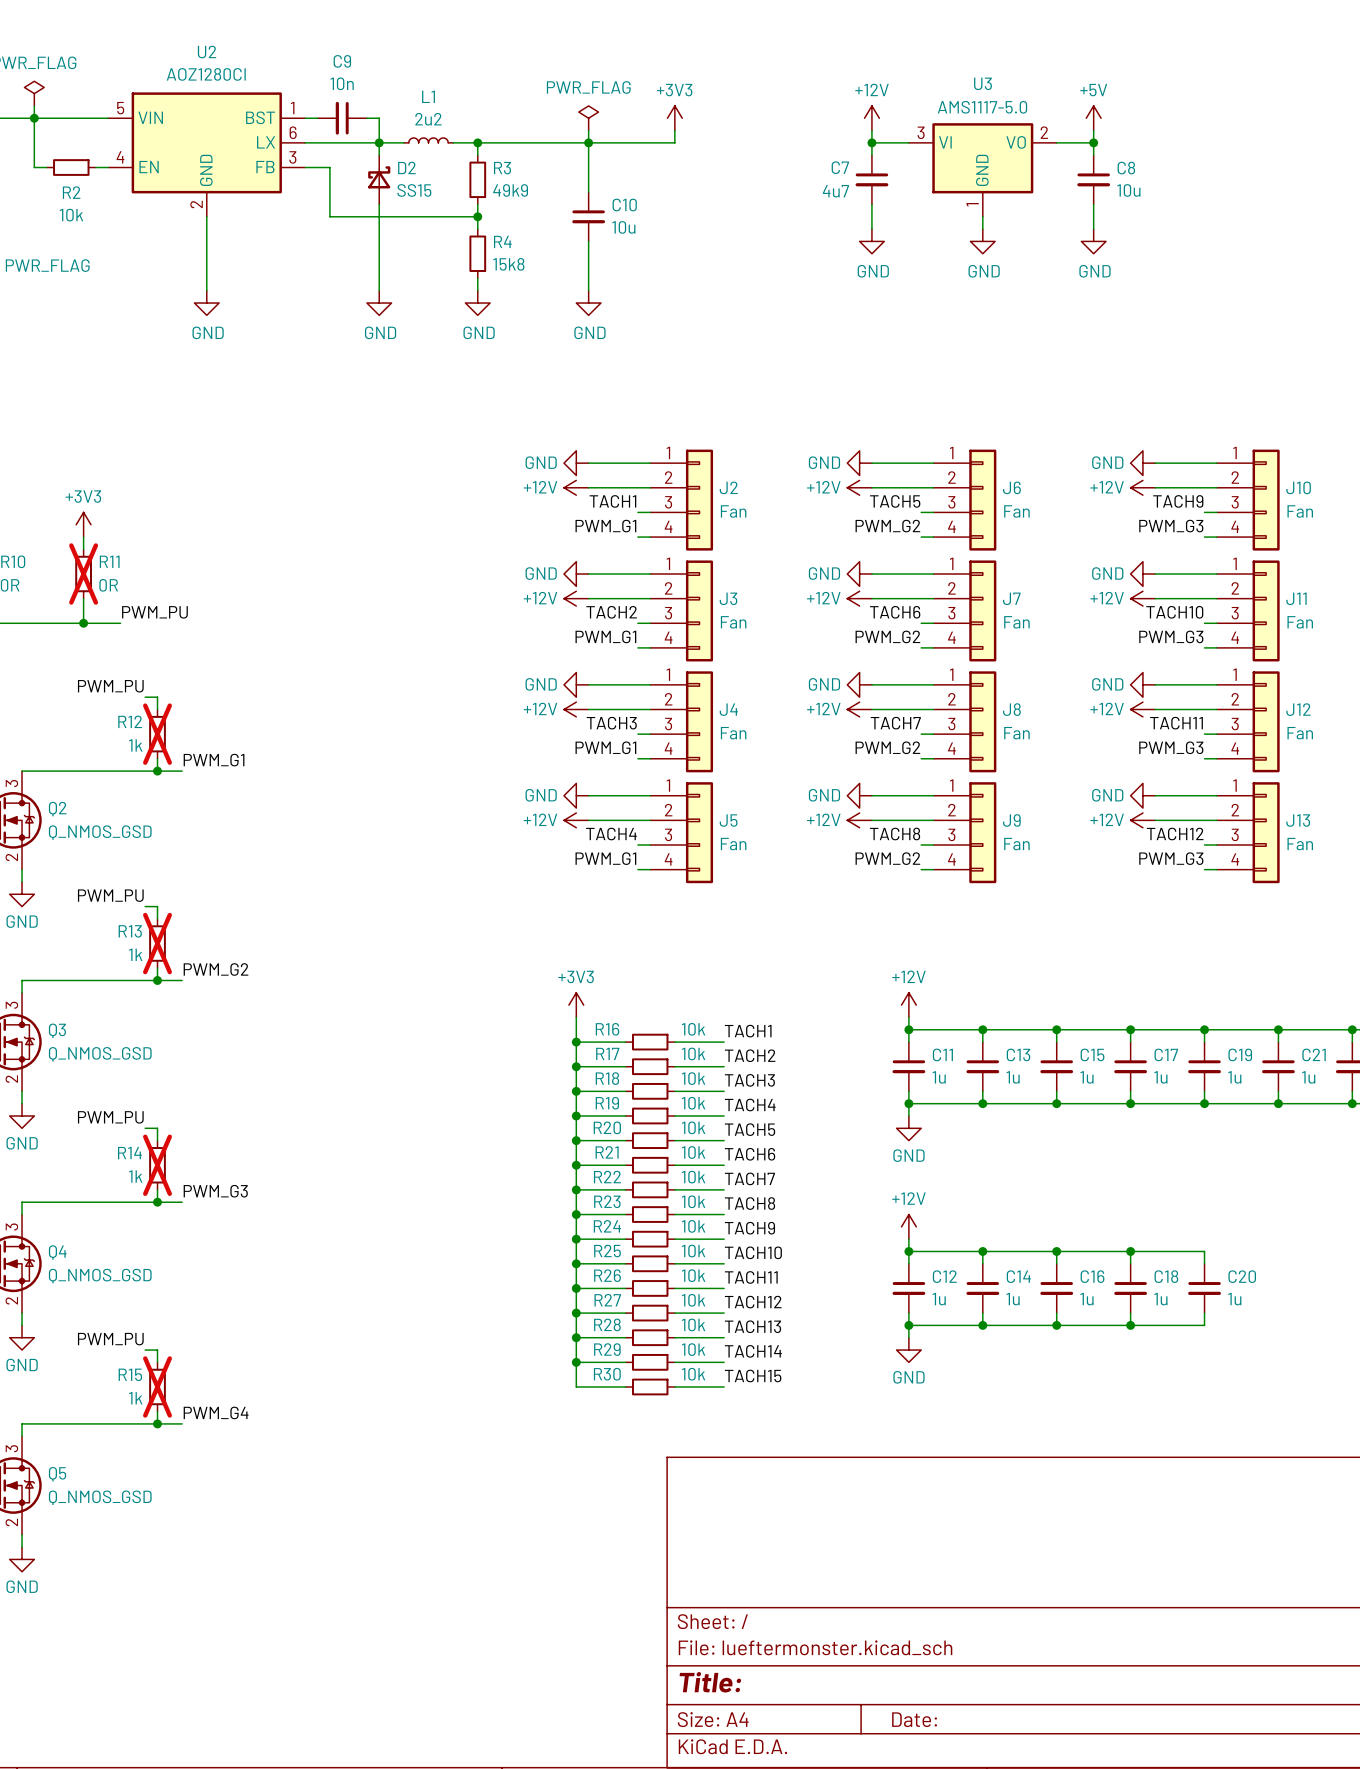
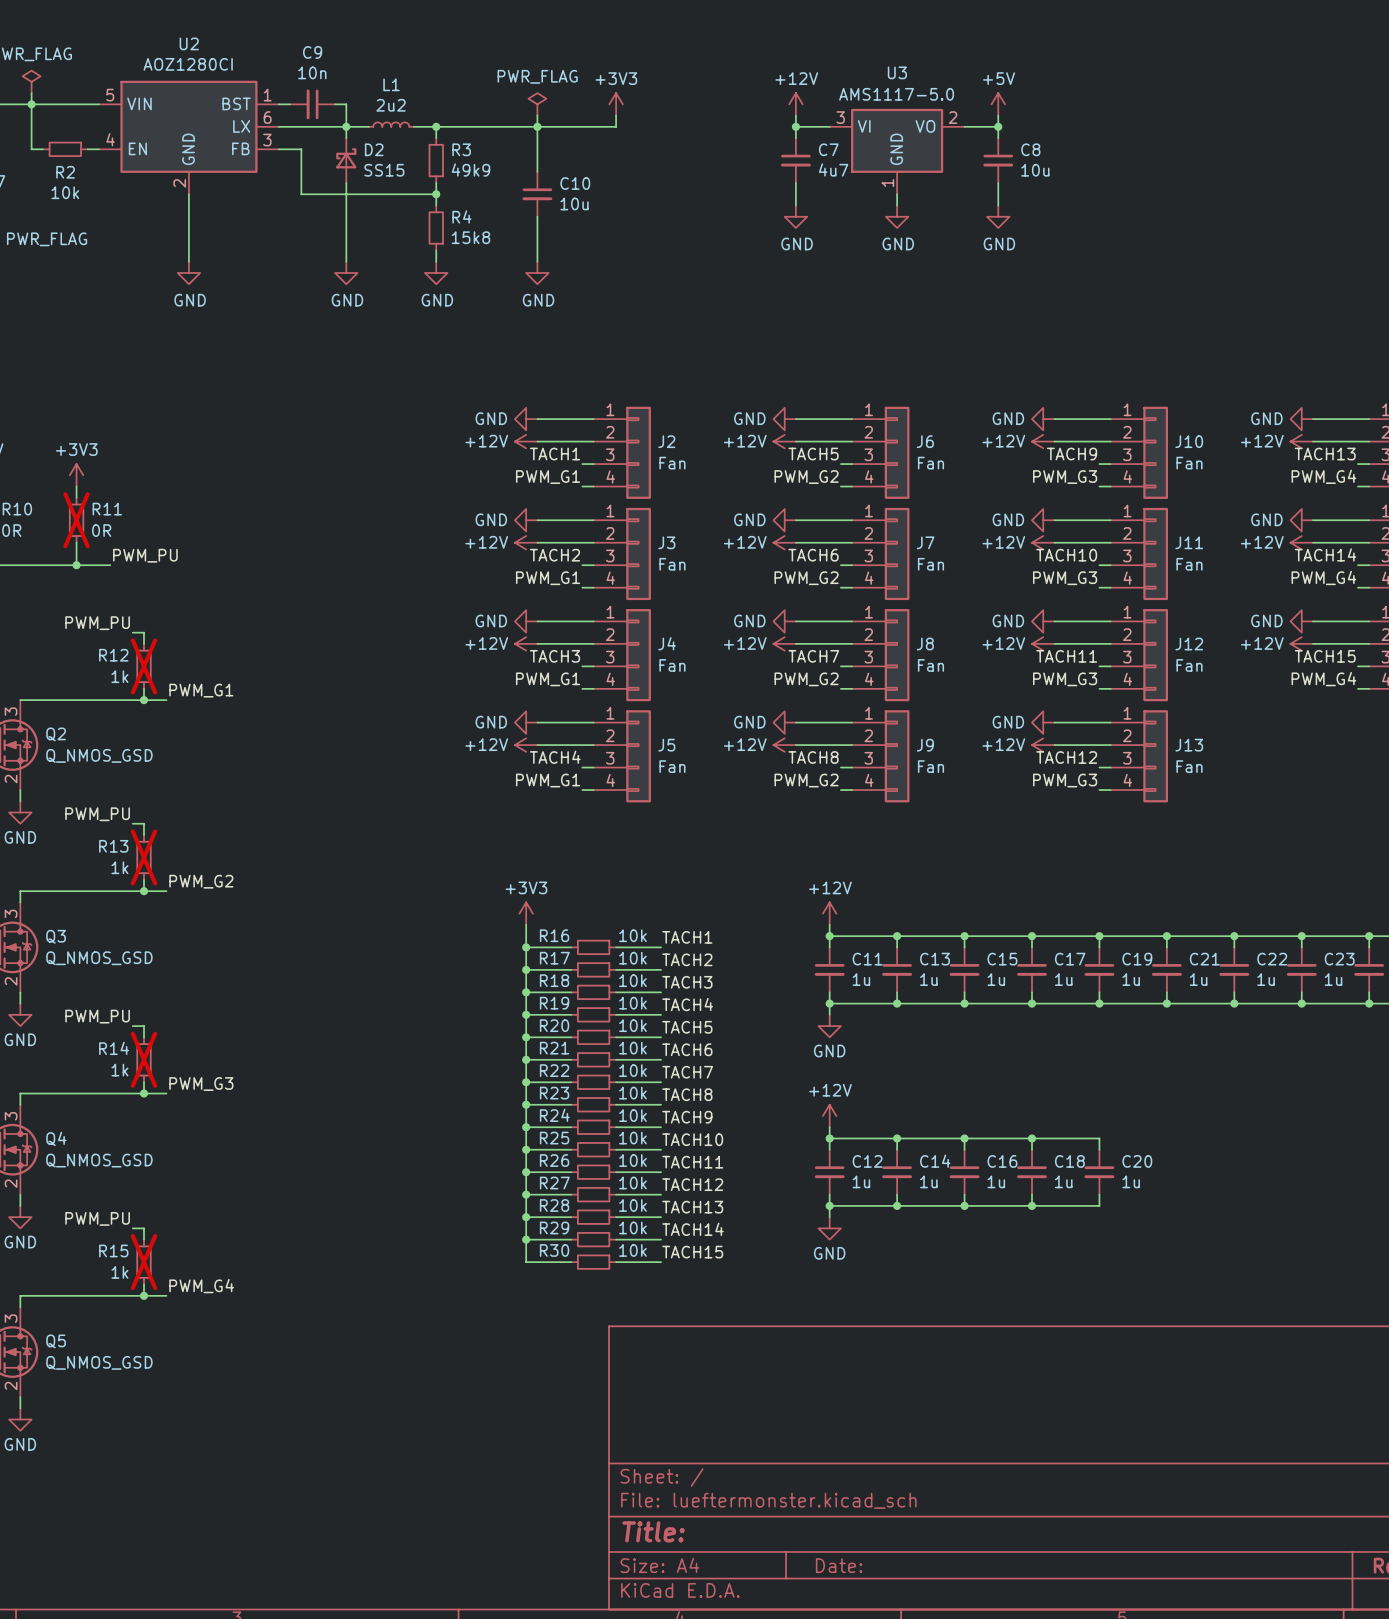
C7 name position: C7 (840, 167) -> C7 (828, 149)
C7 value position: 4u7 (835, 191) -> 4u7 (833, 169)

